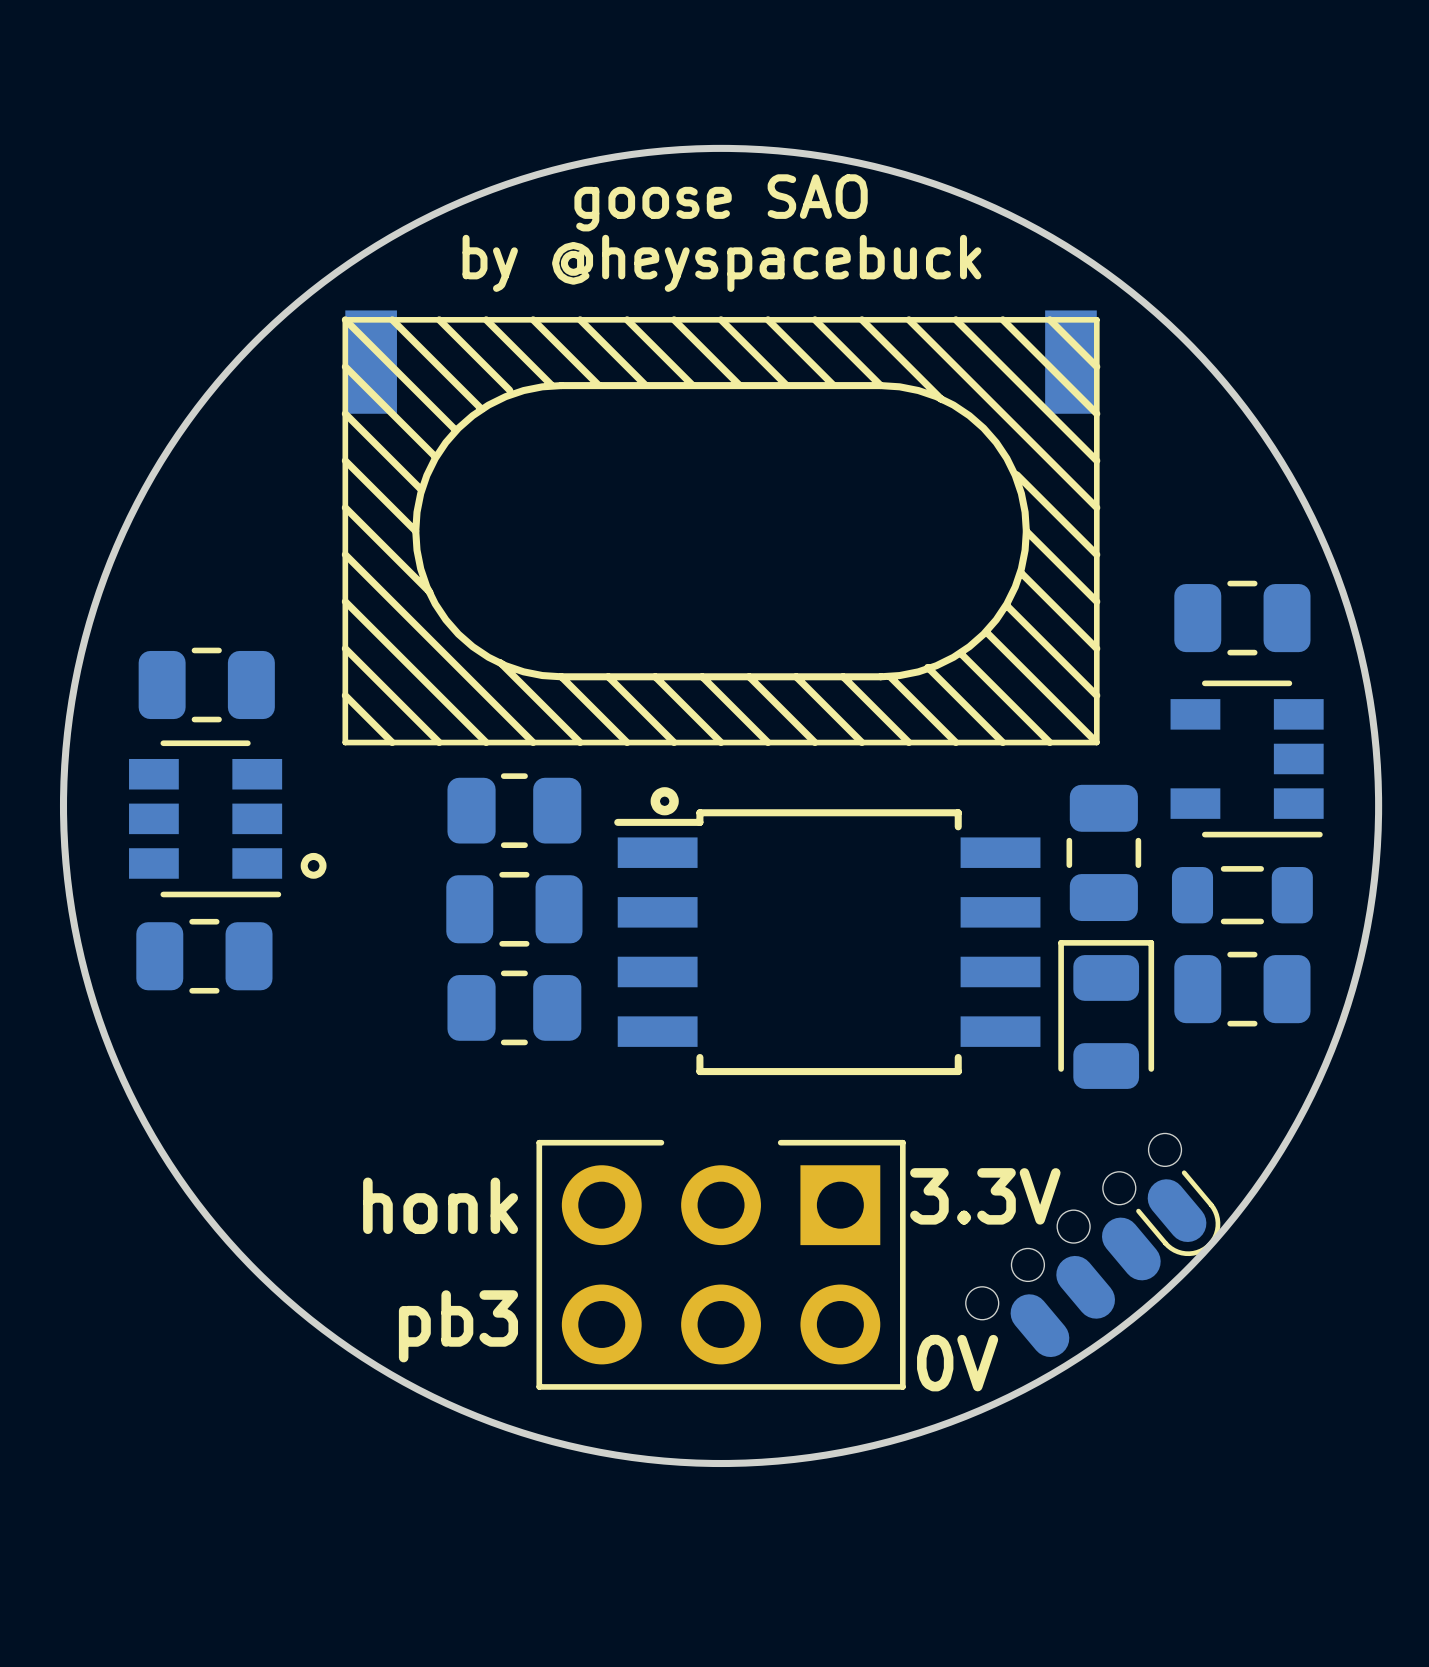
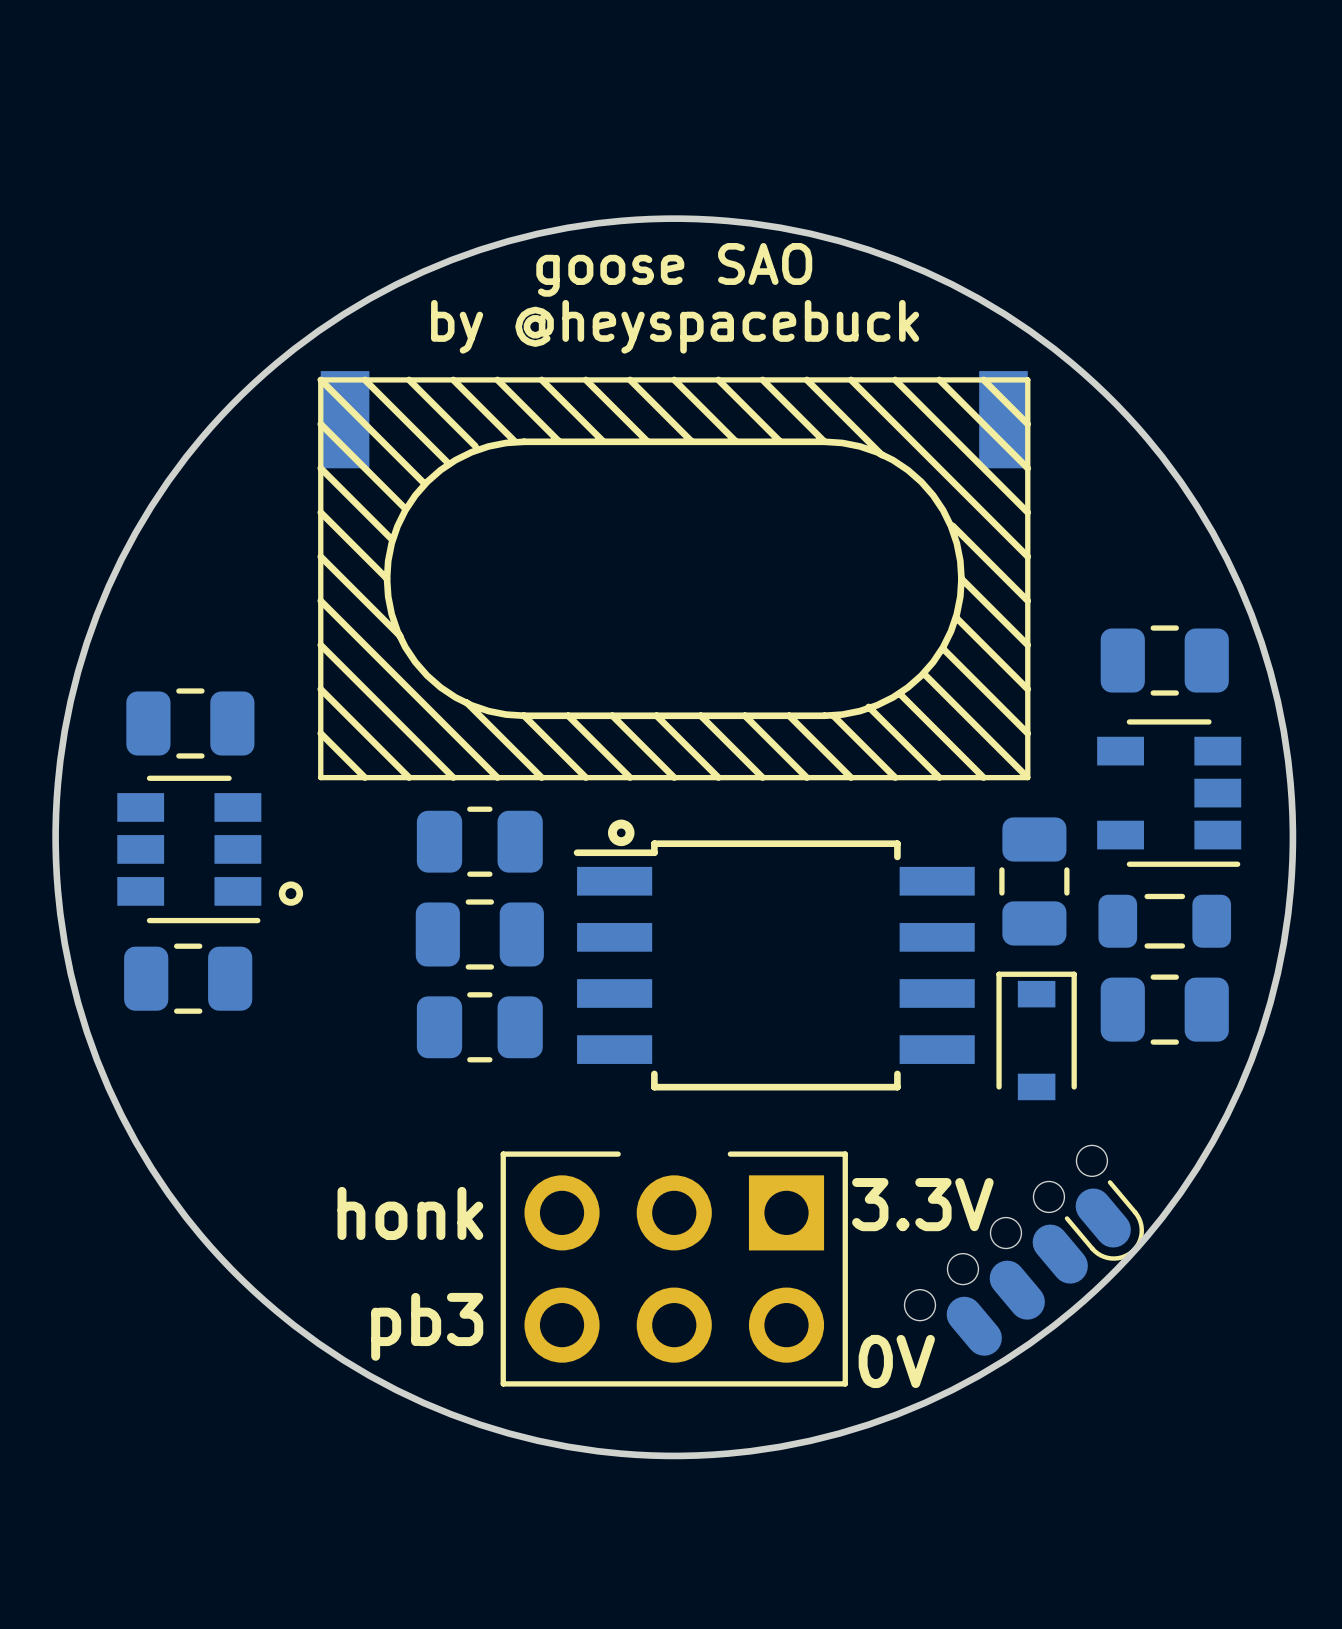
part footprint: [1058, 940, 1155, 1089] -> [996, 971, 1077, 1101]

